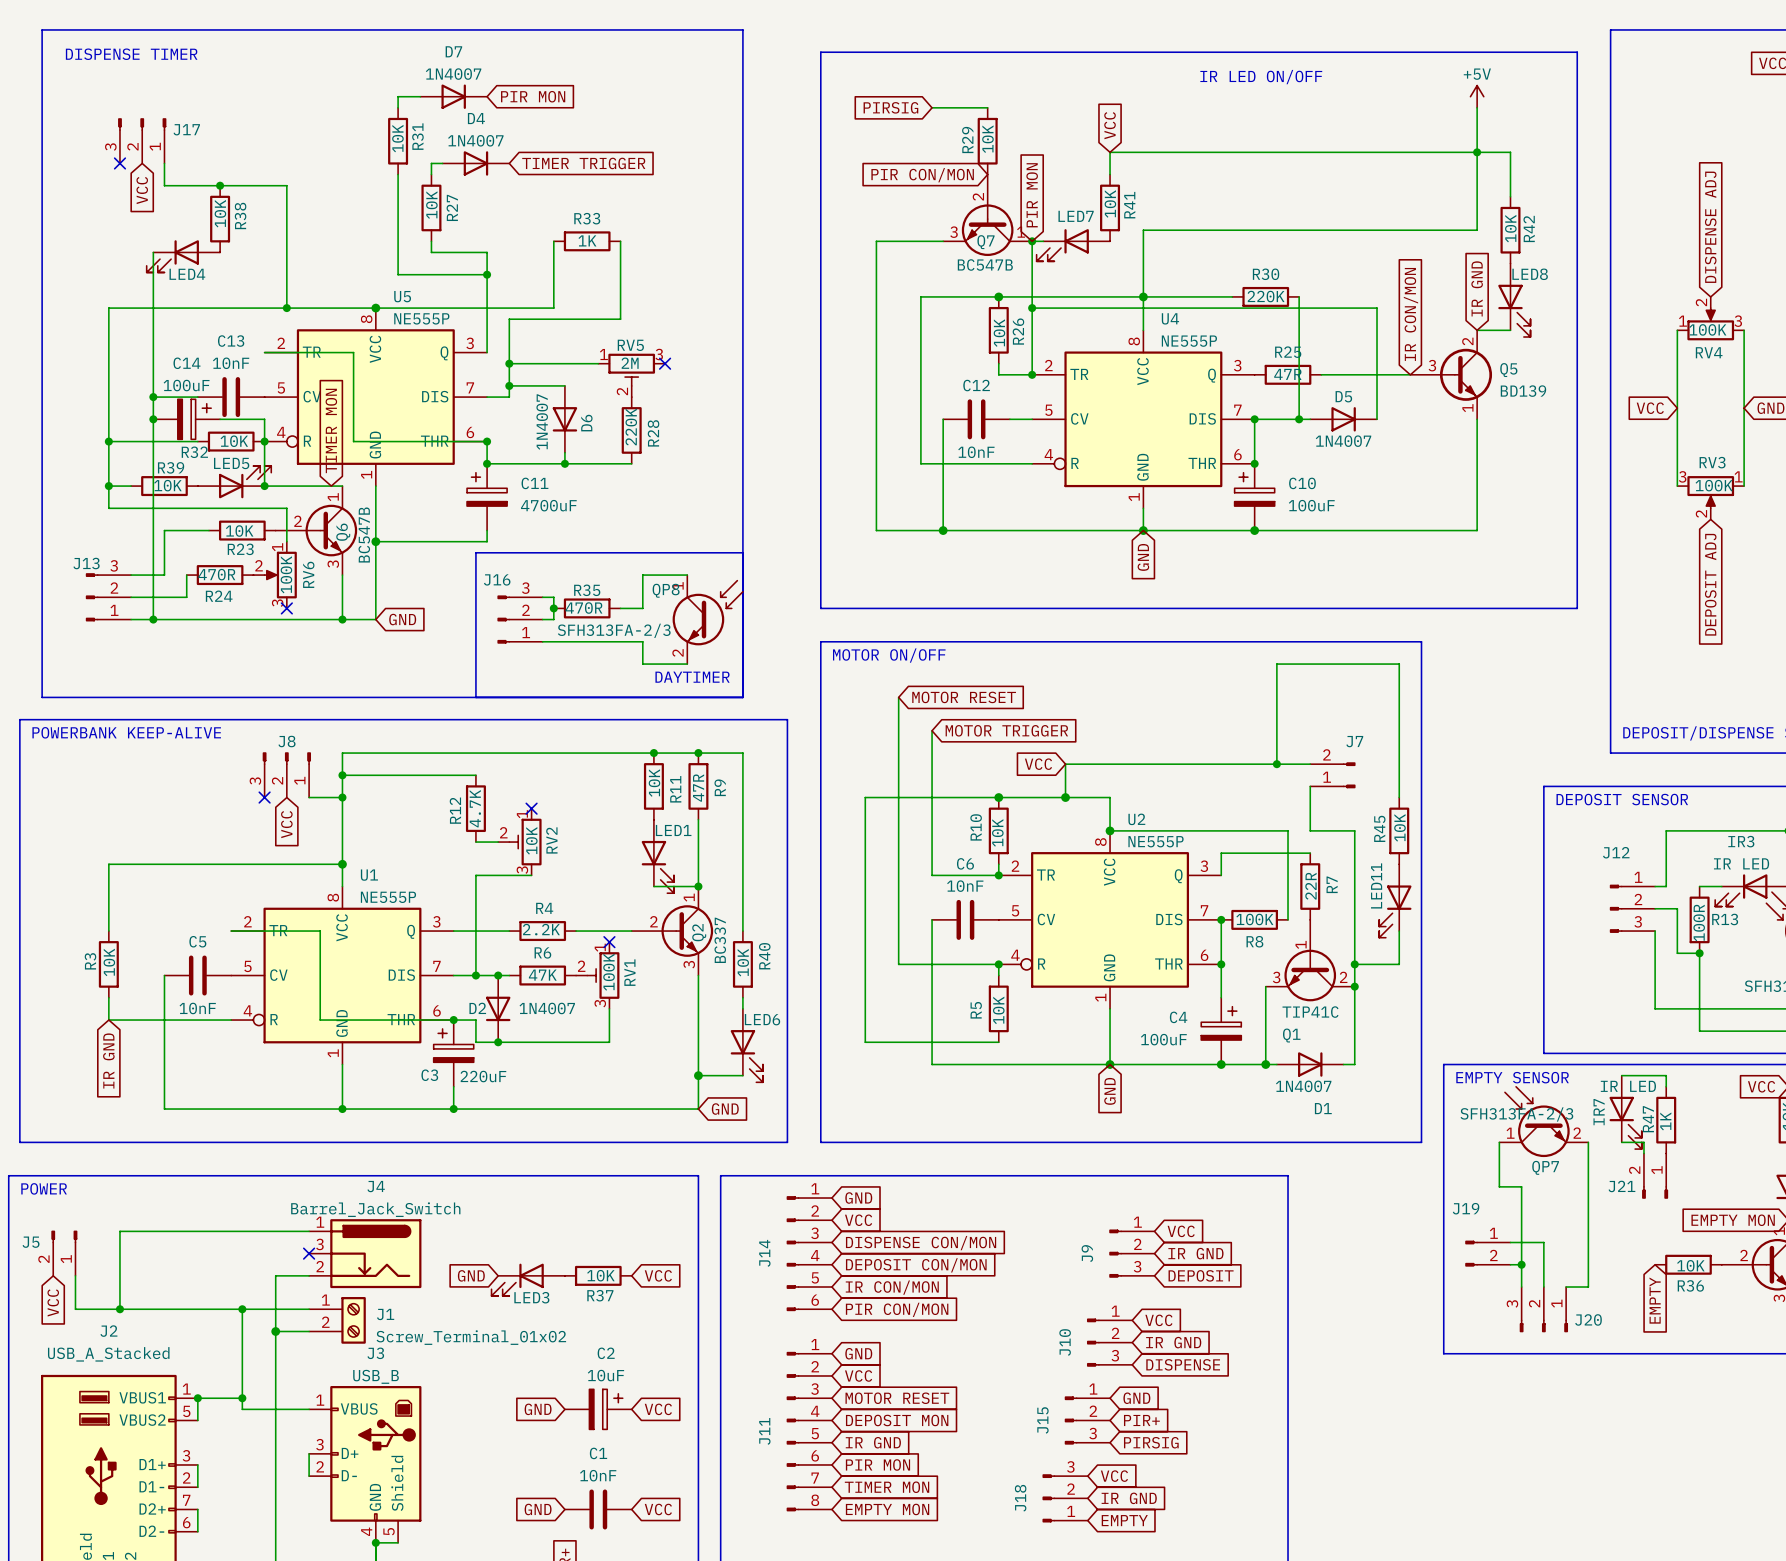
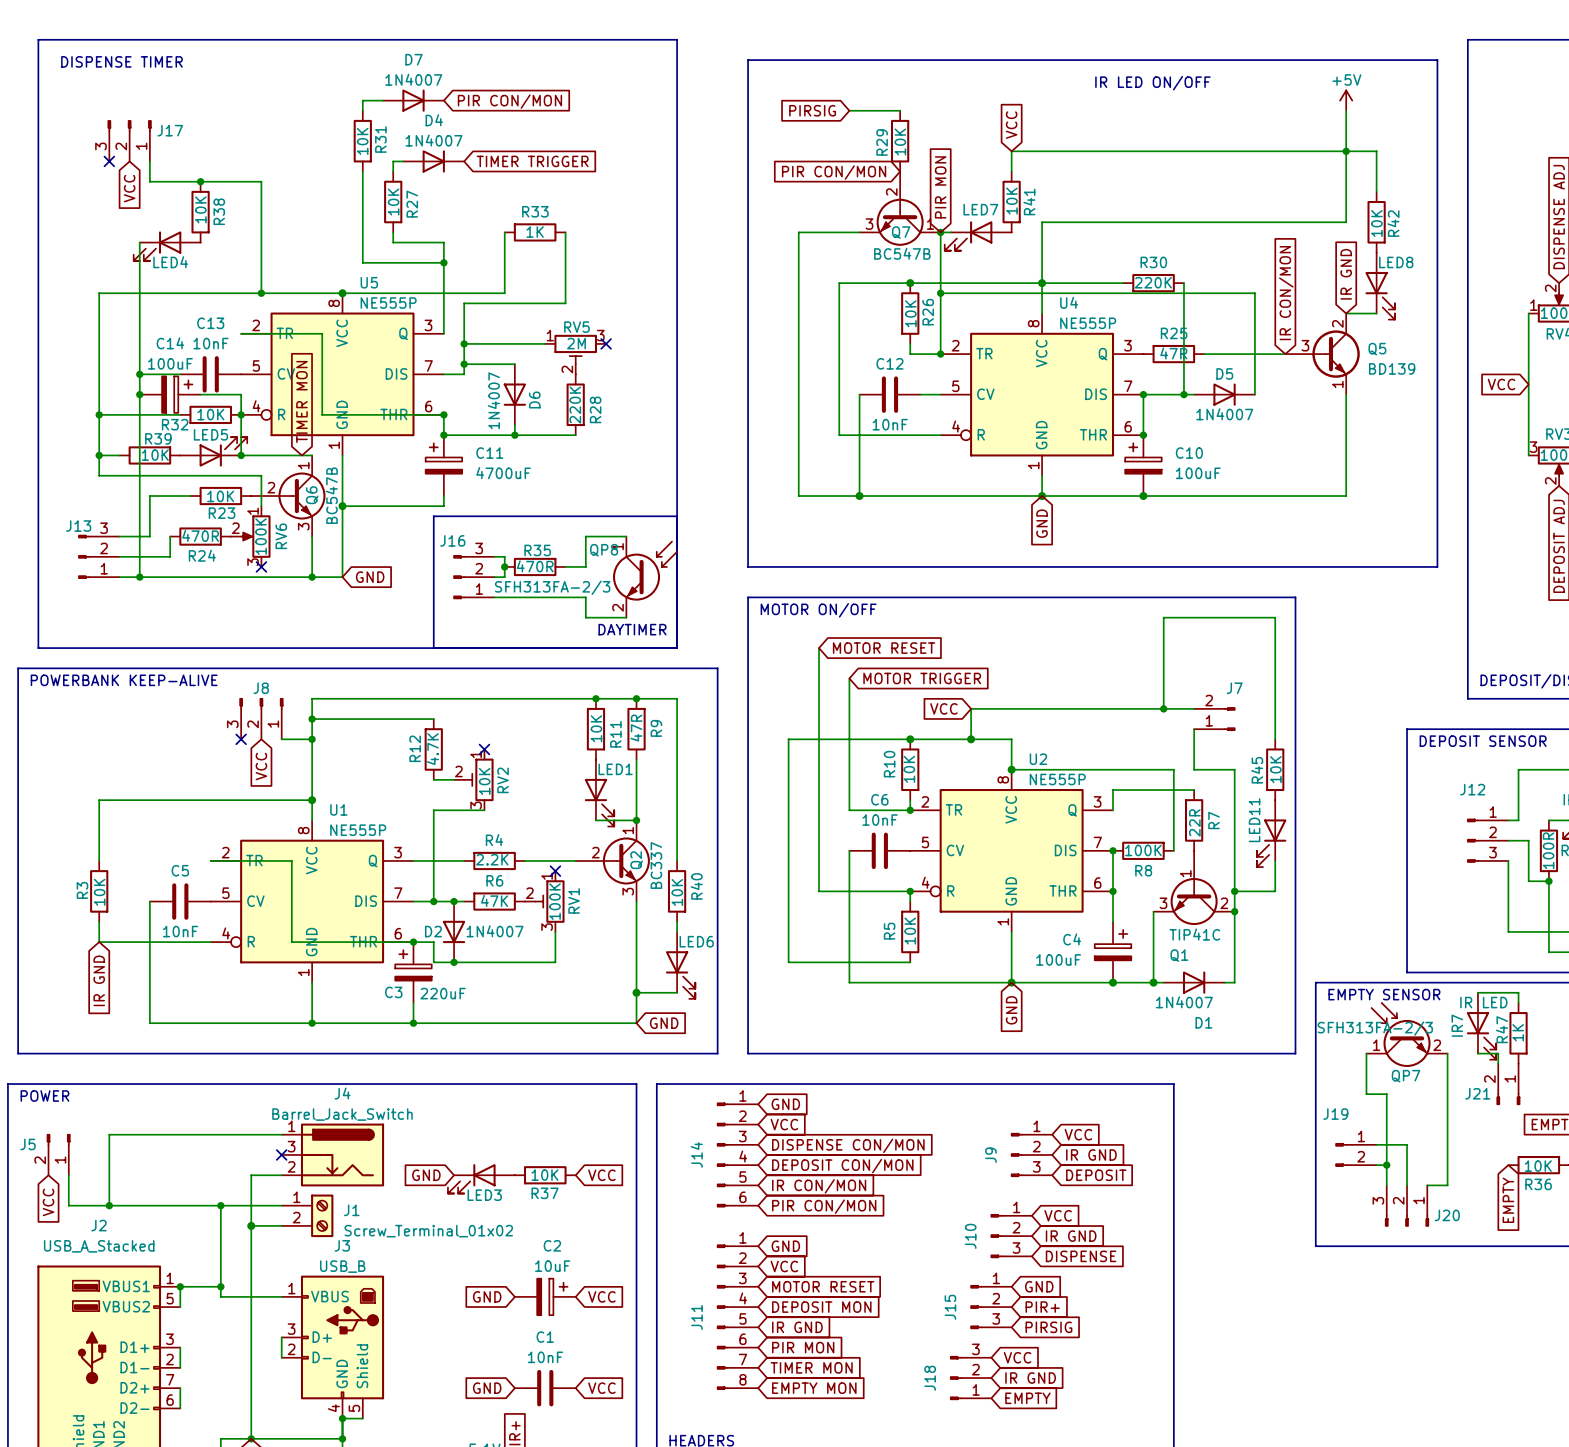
global label: PIR MON (533, 96) -> PIR CON/MON (509, 101)

